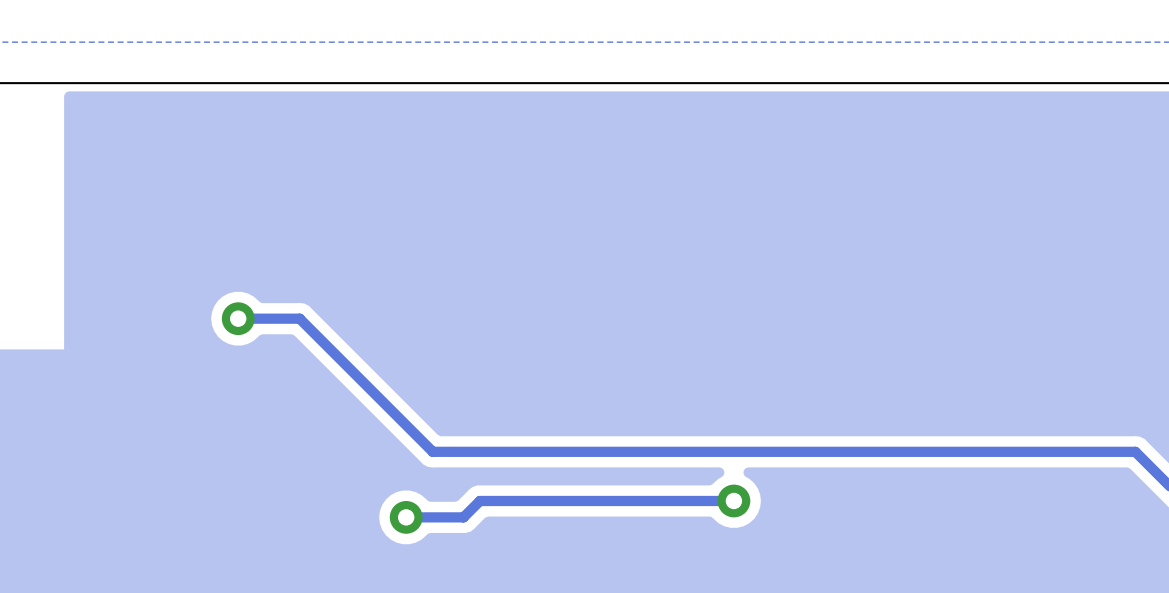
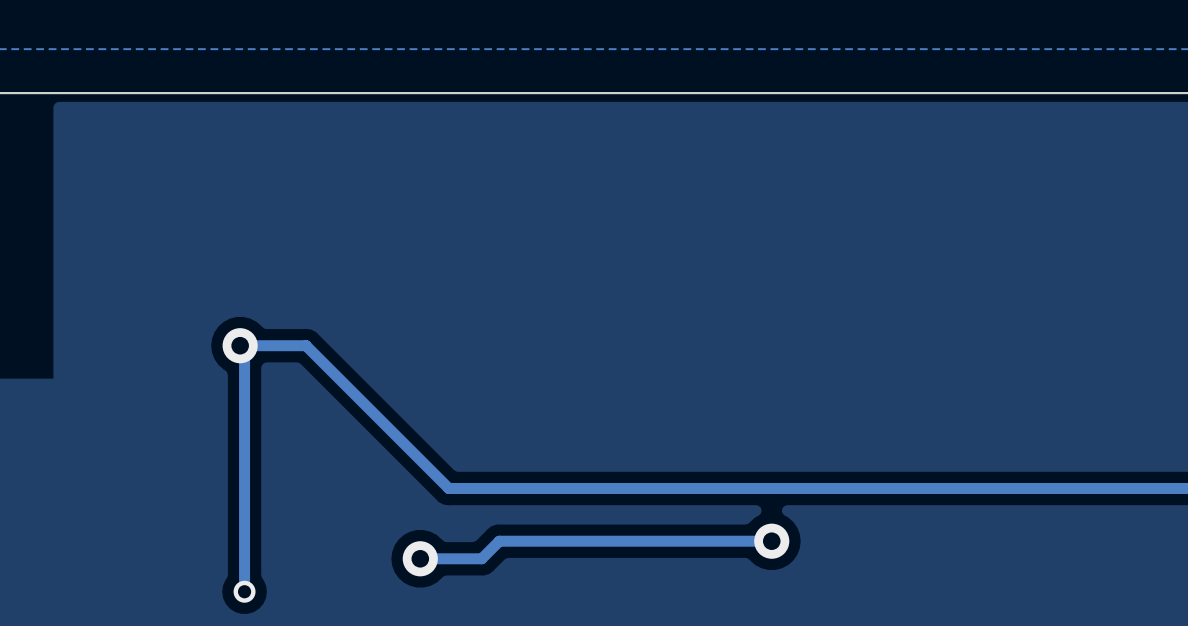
track: none -> (240, 345) (244, 350) (244, 591)
via: none -> (244, 591)

